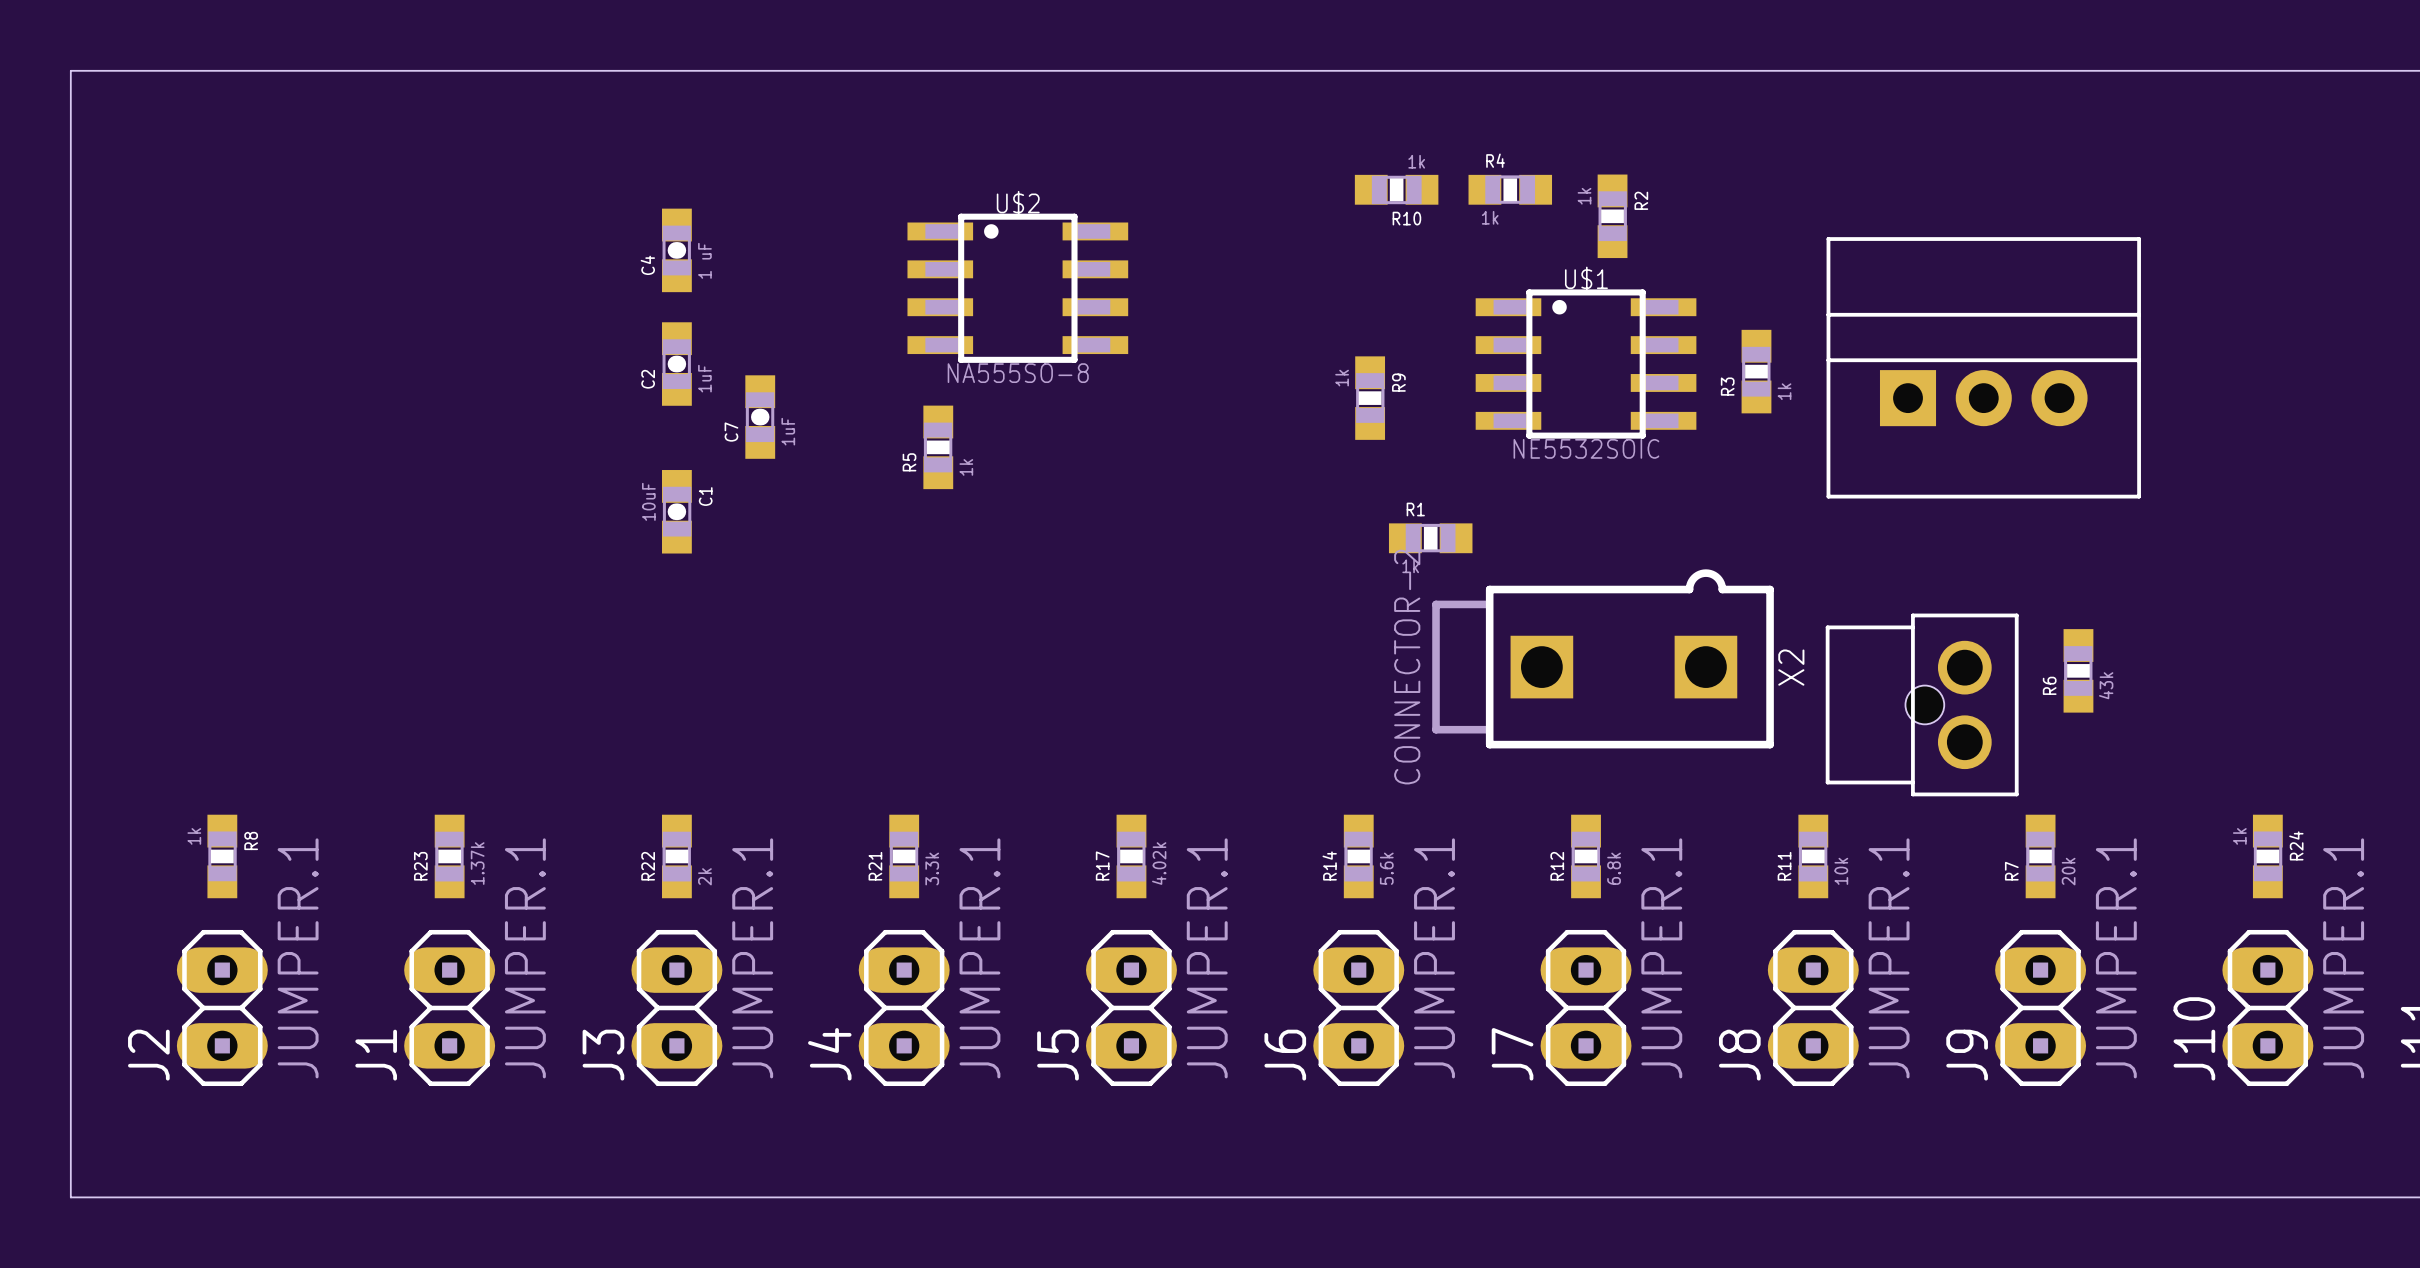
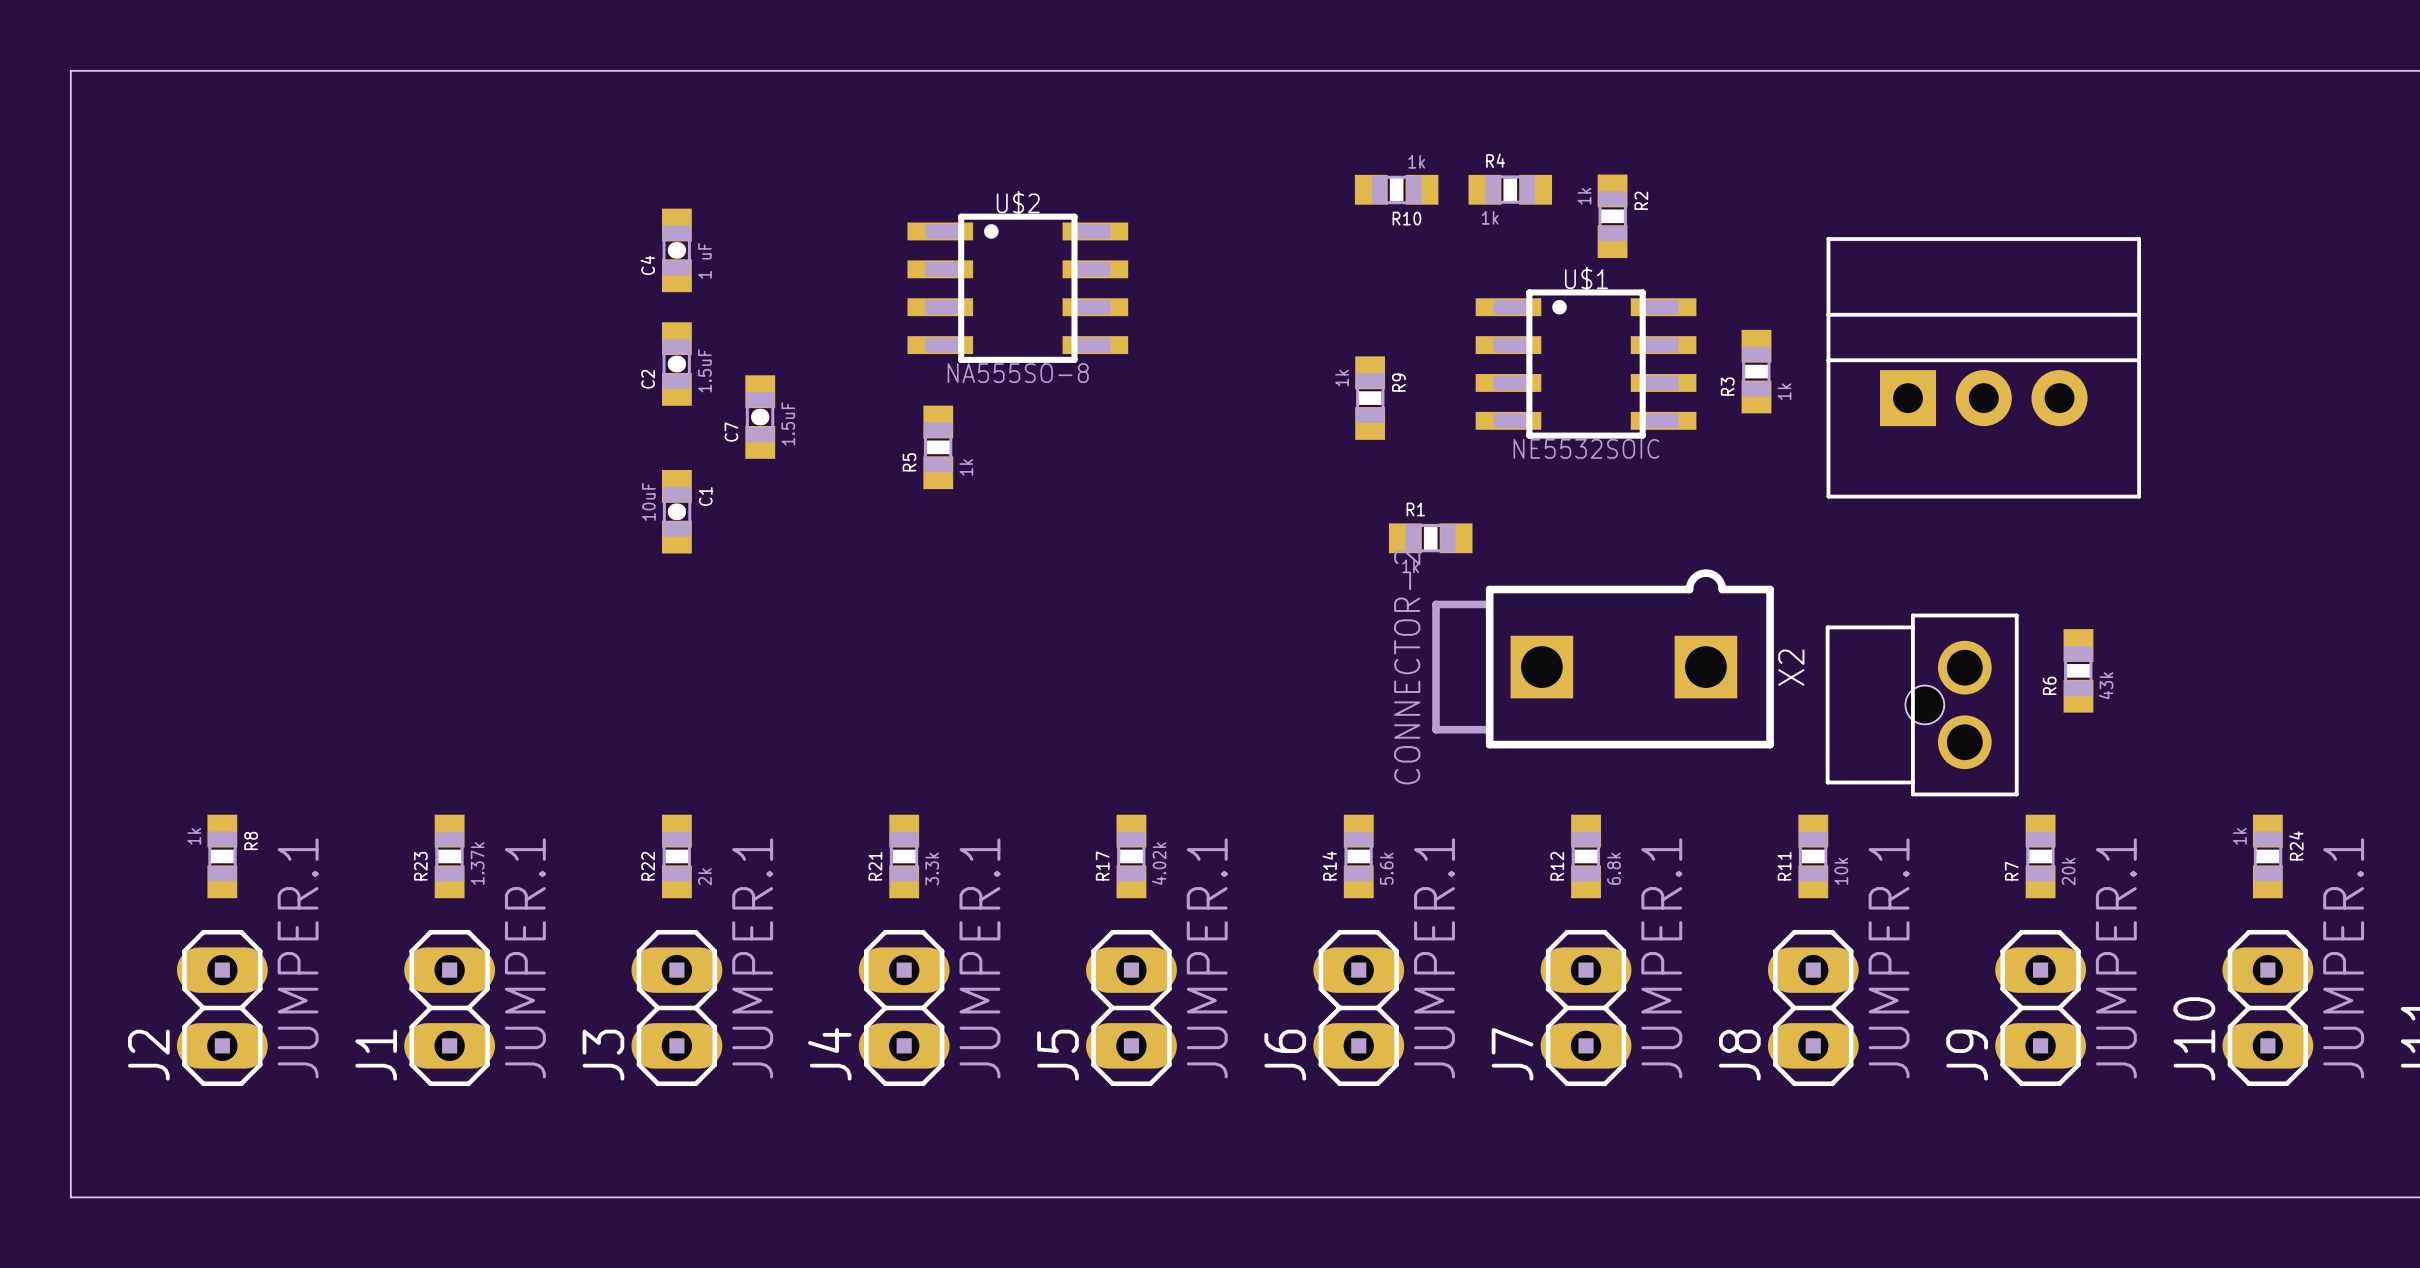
C2 value: 1uF (704, 378) -> 1.5uF (704, 370)
C7 value: 1uF (788, 431) -> 1.5uF (788, 423)

